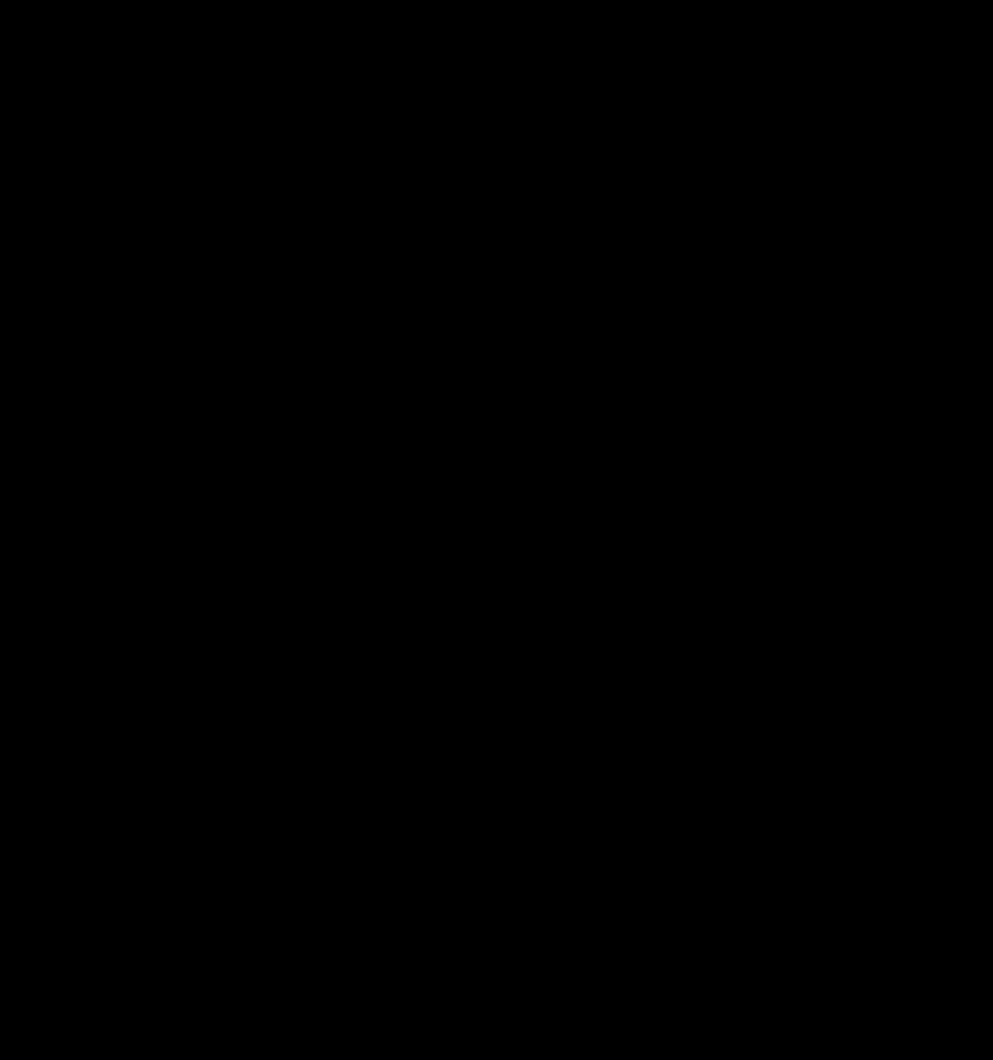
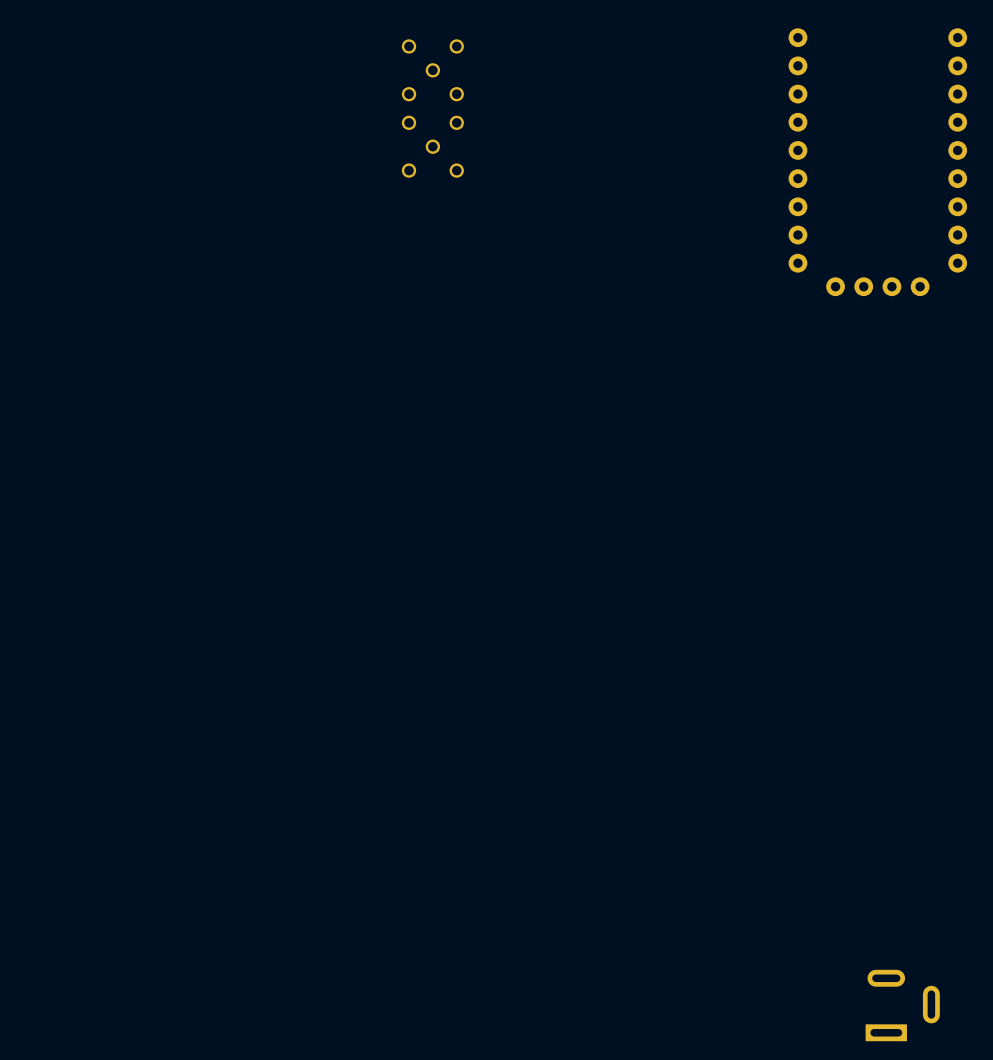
part: none -> (432, 70)
part: none -> (432, 146)
part: none -> (877, 162)
part: none -> (902, 1005)

